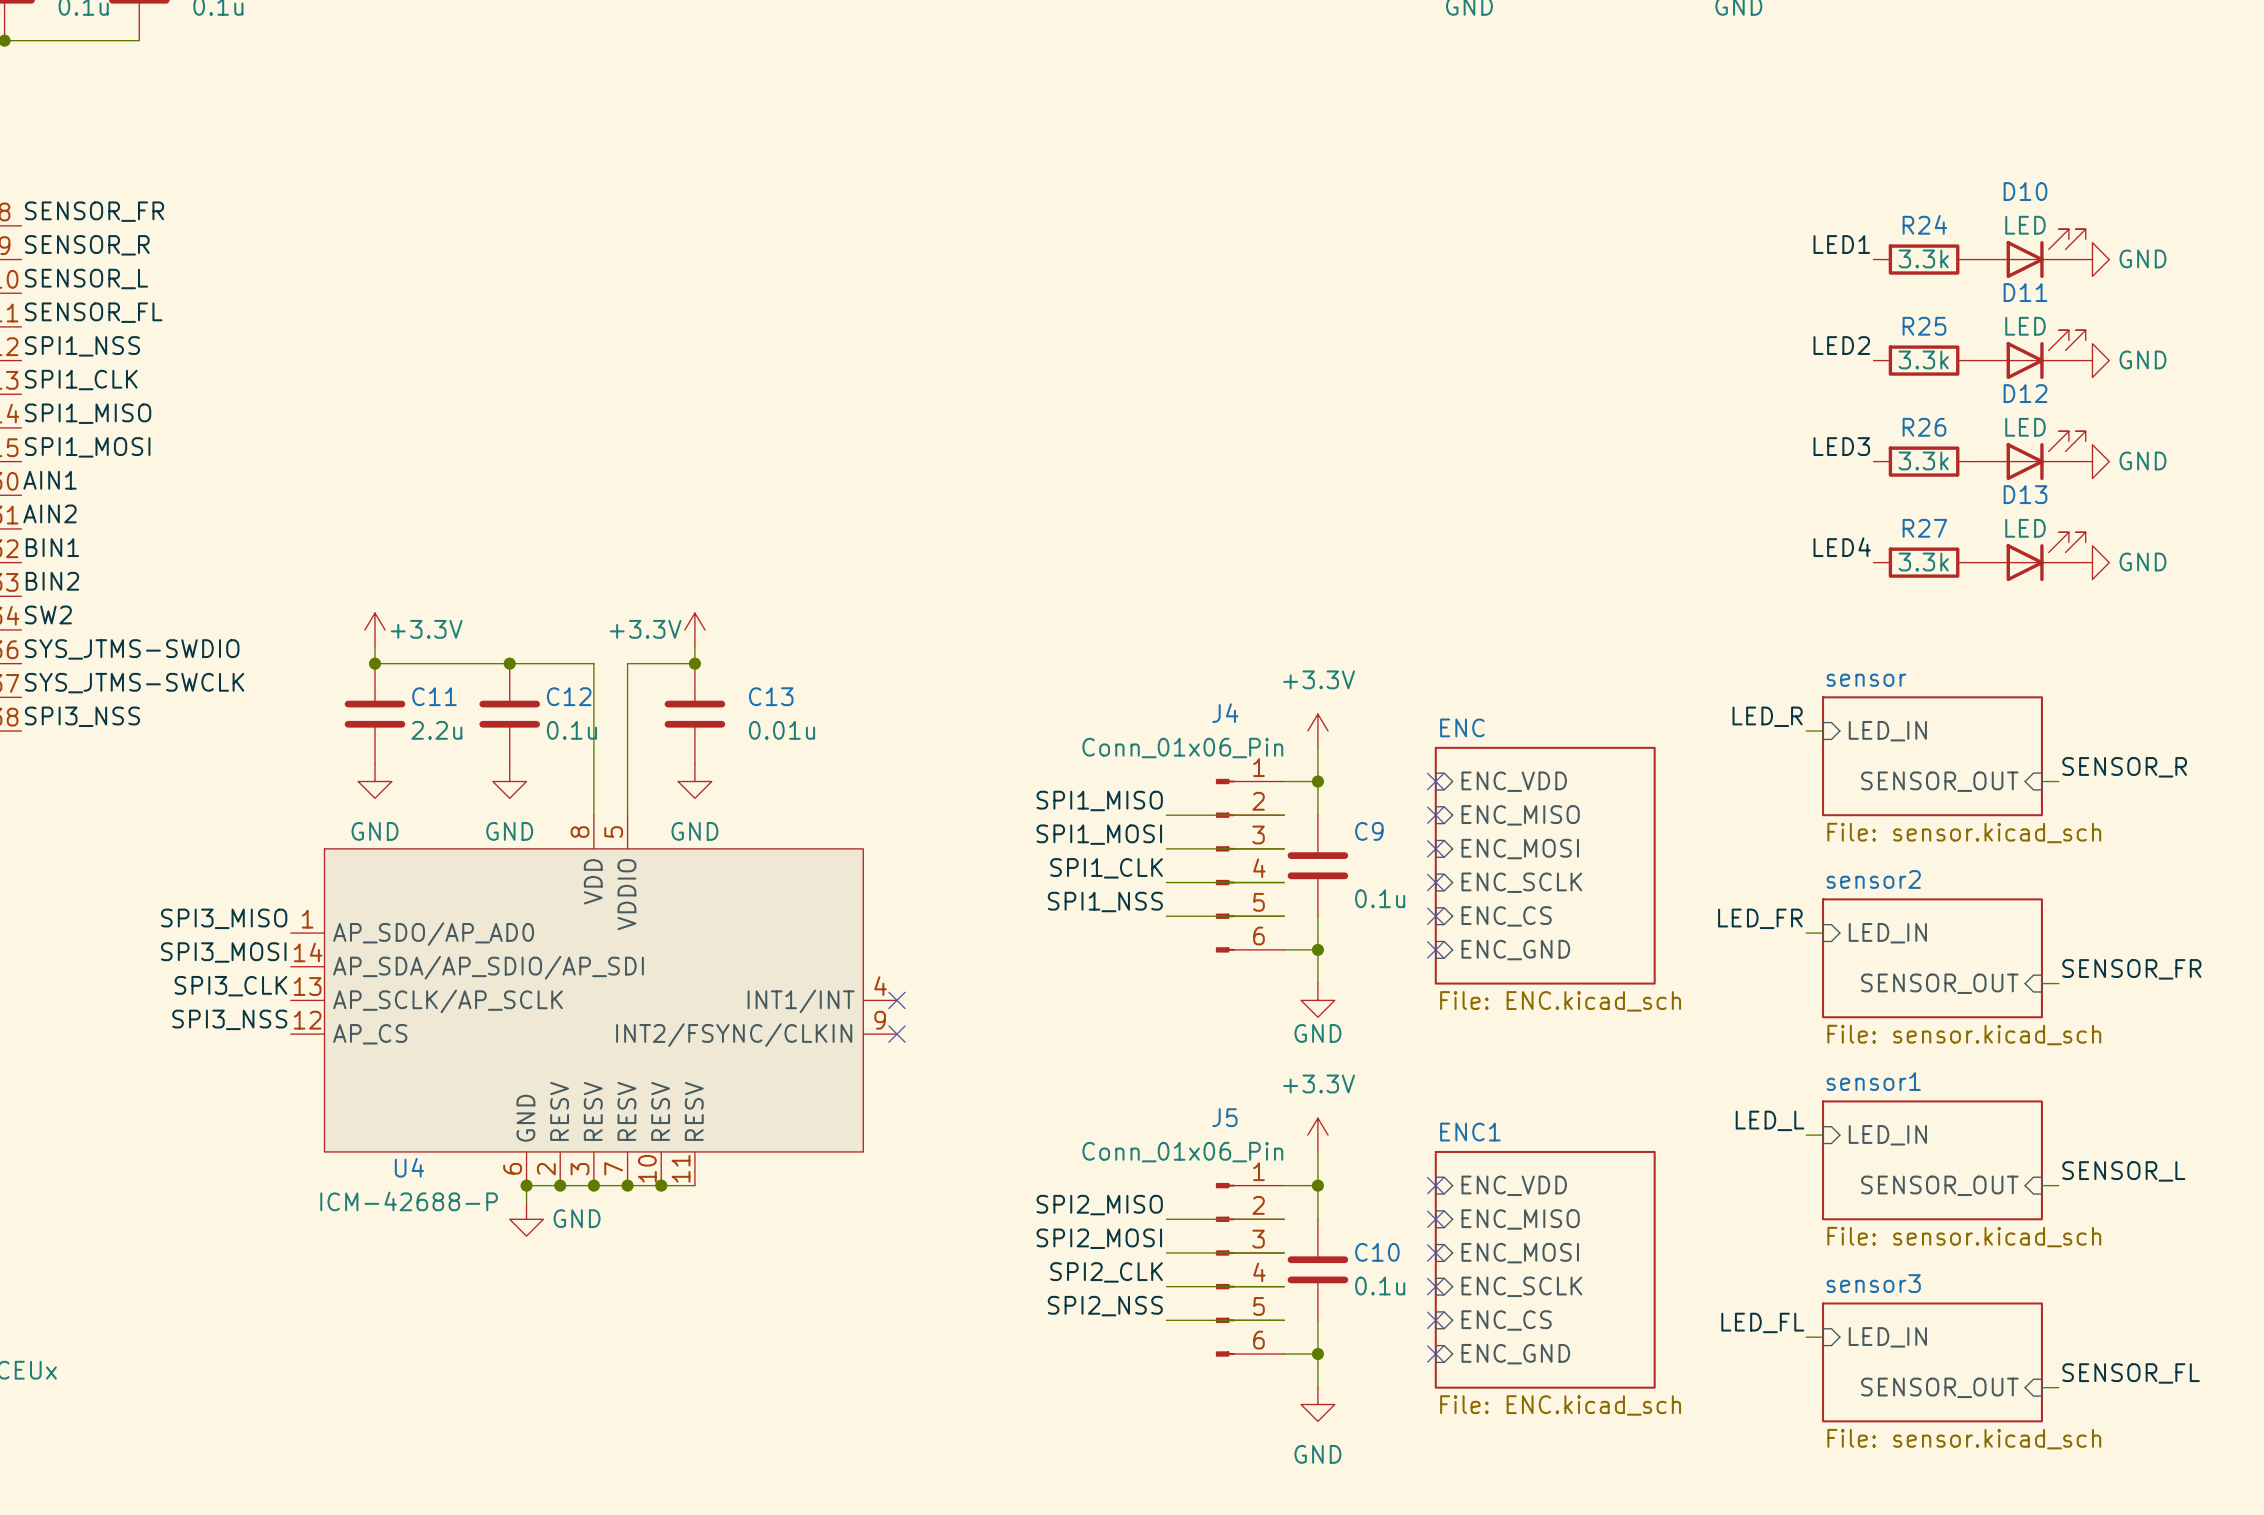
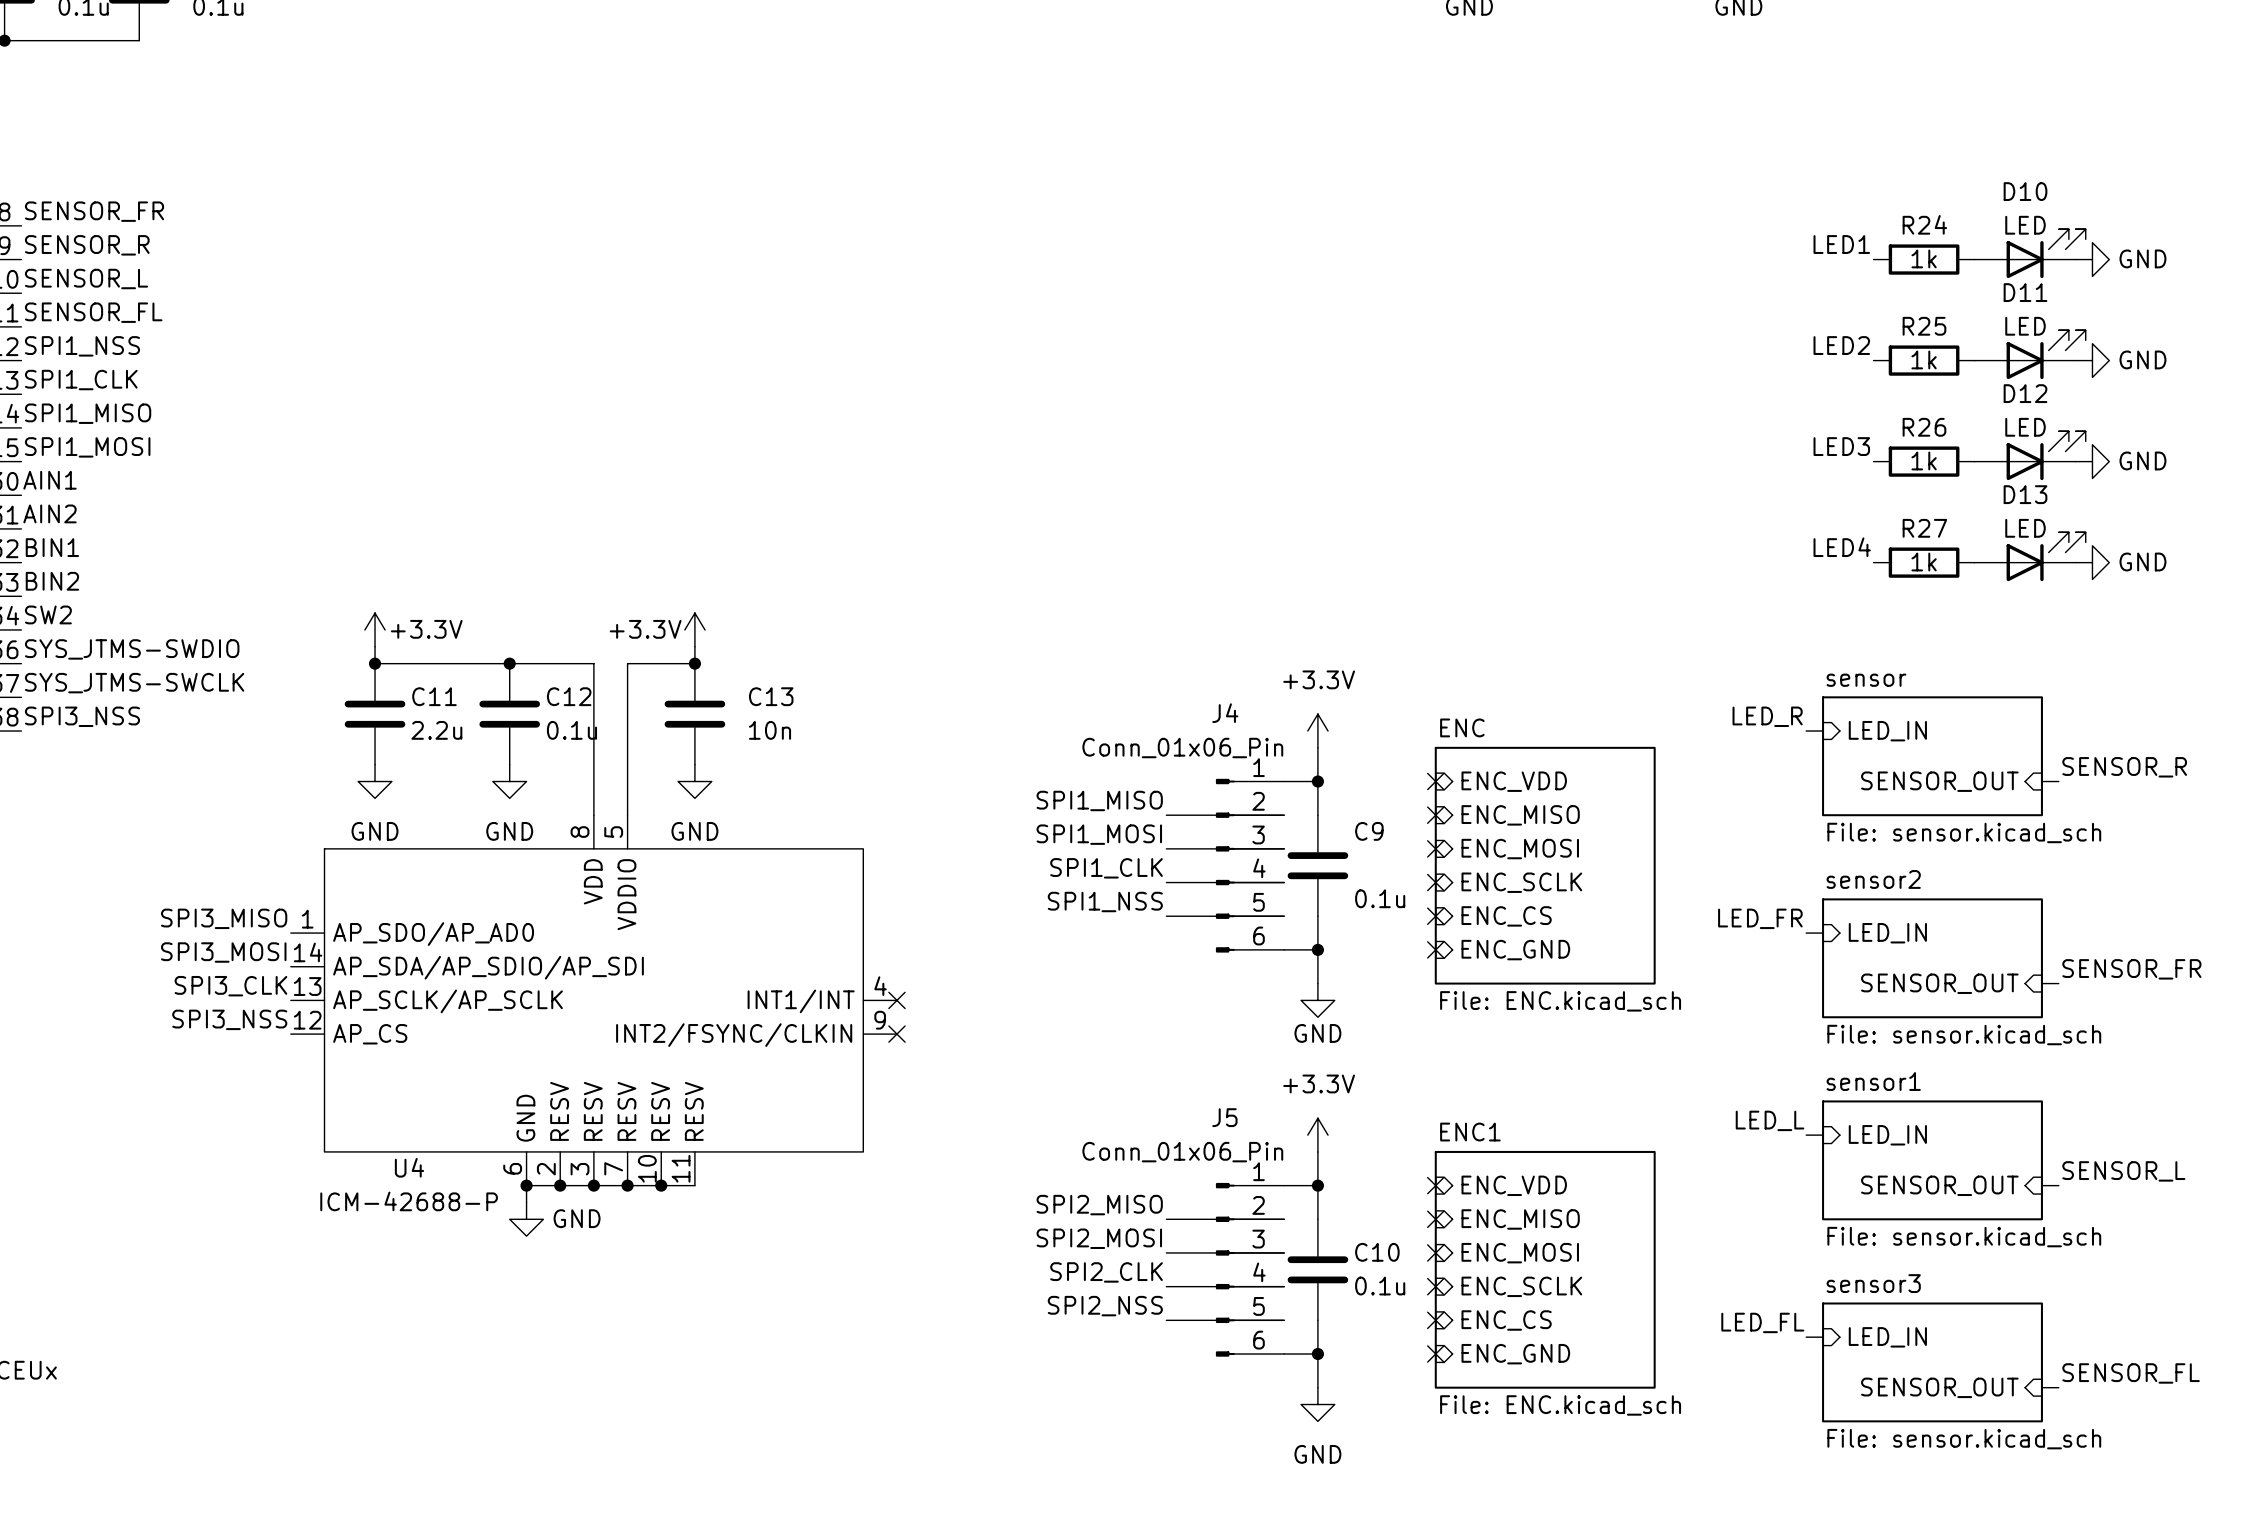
R24 value: 3.3k (1923, 258) -> 1k (1924, 258)
R25 value: 3.3k (1923, 359) -> 1k (1924, 359)
R26 value: 3.3k (1923, 460) -> 1k (1924, 460)
R27 value: 3.3k (1923, 562) -> 1k (1924, 562)
C13 value: 0.01u (782, 730) -> 10n (770, 730)

